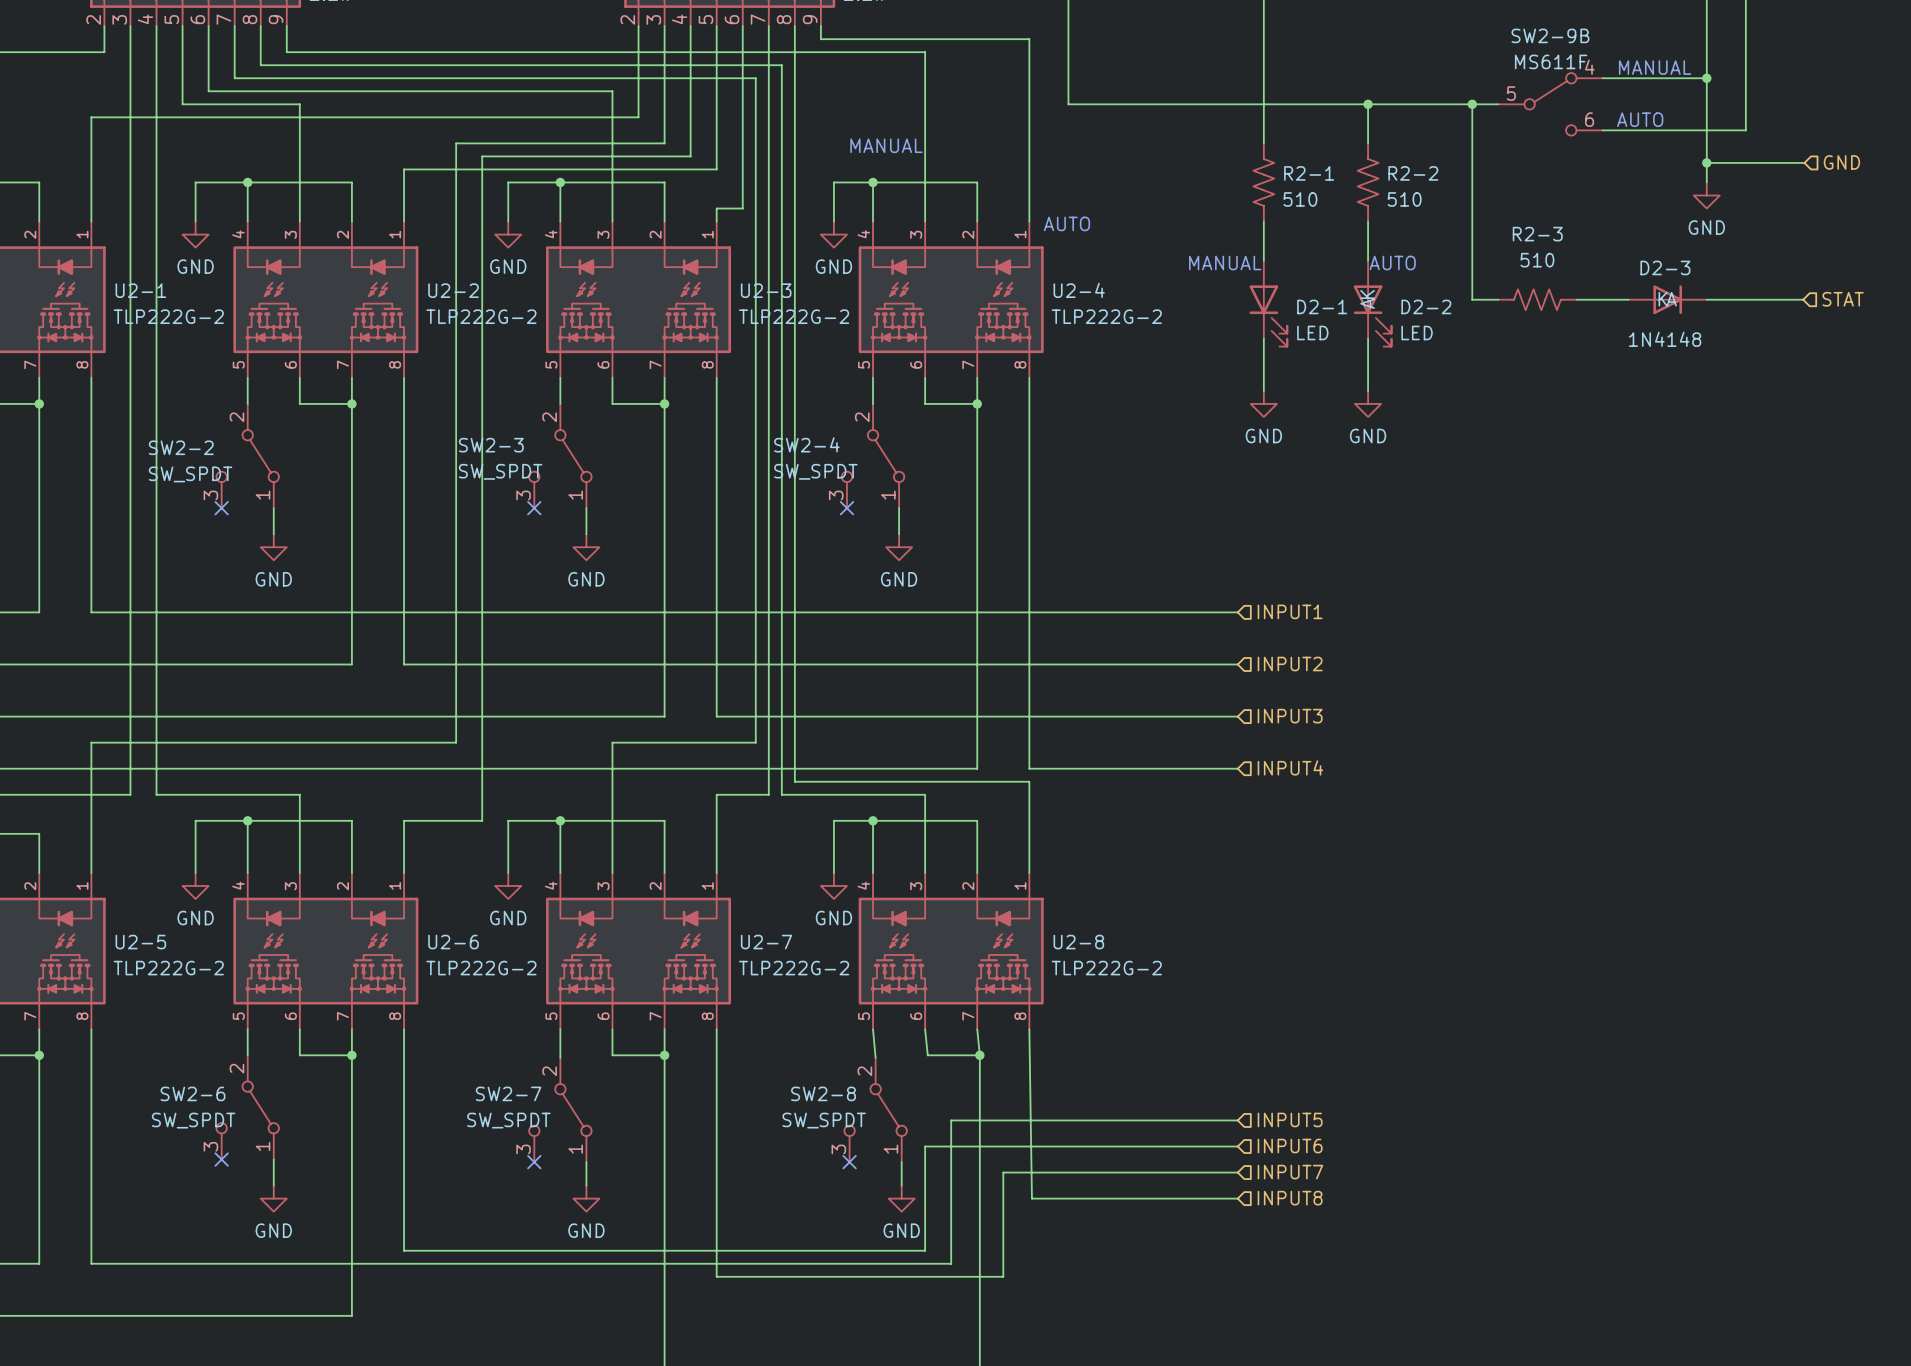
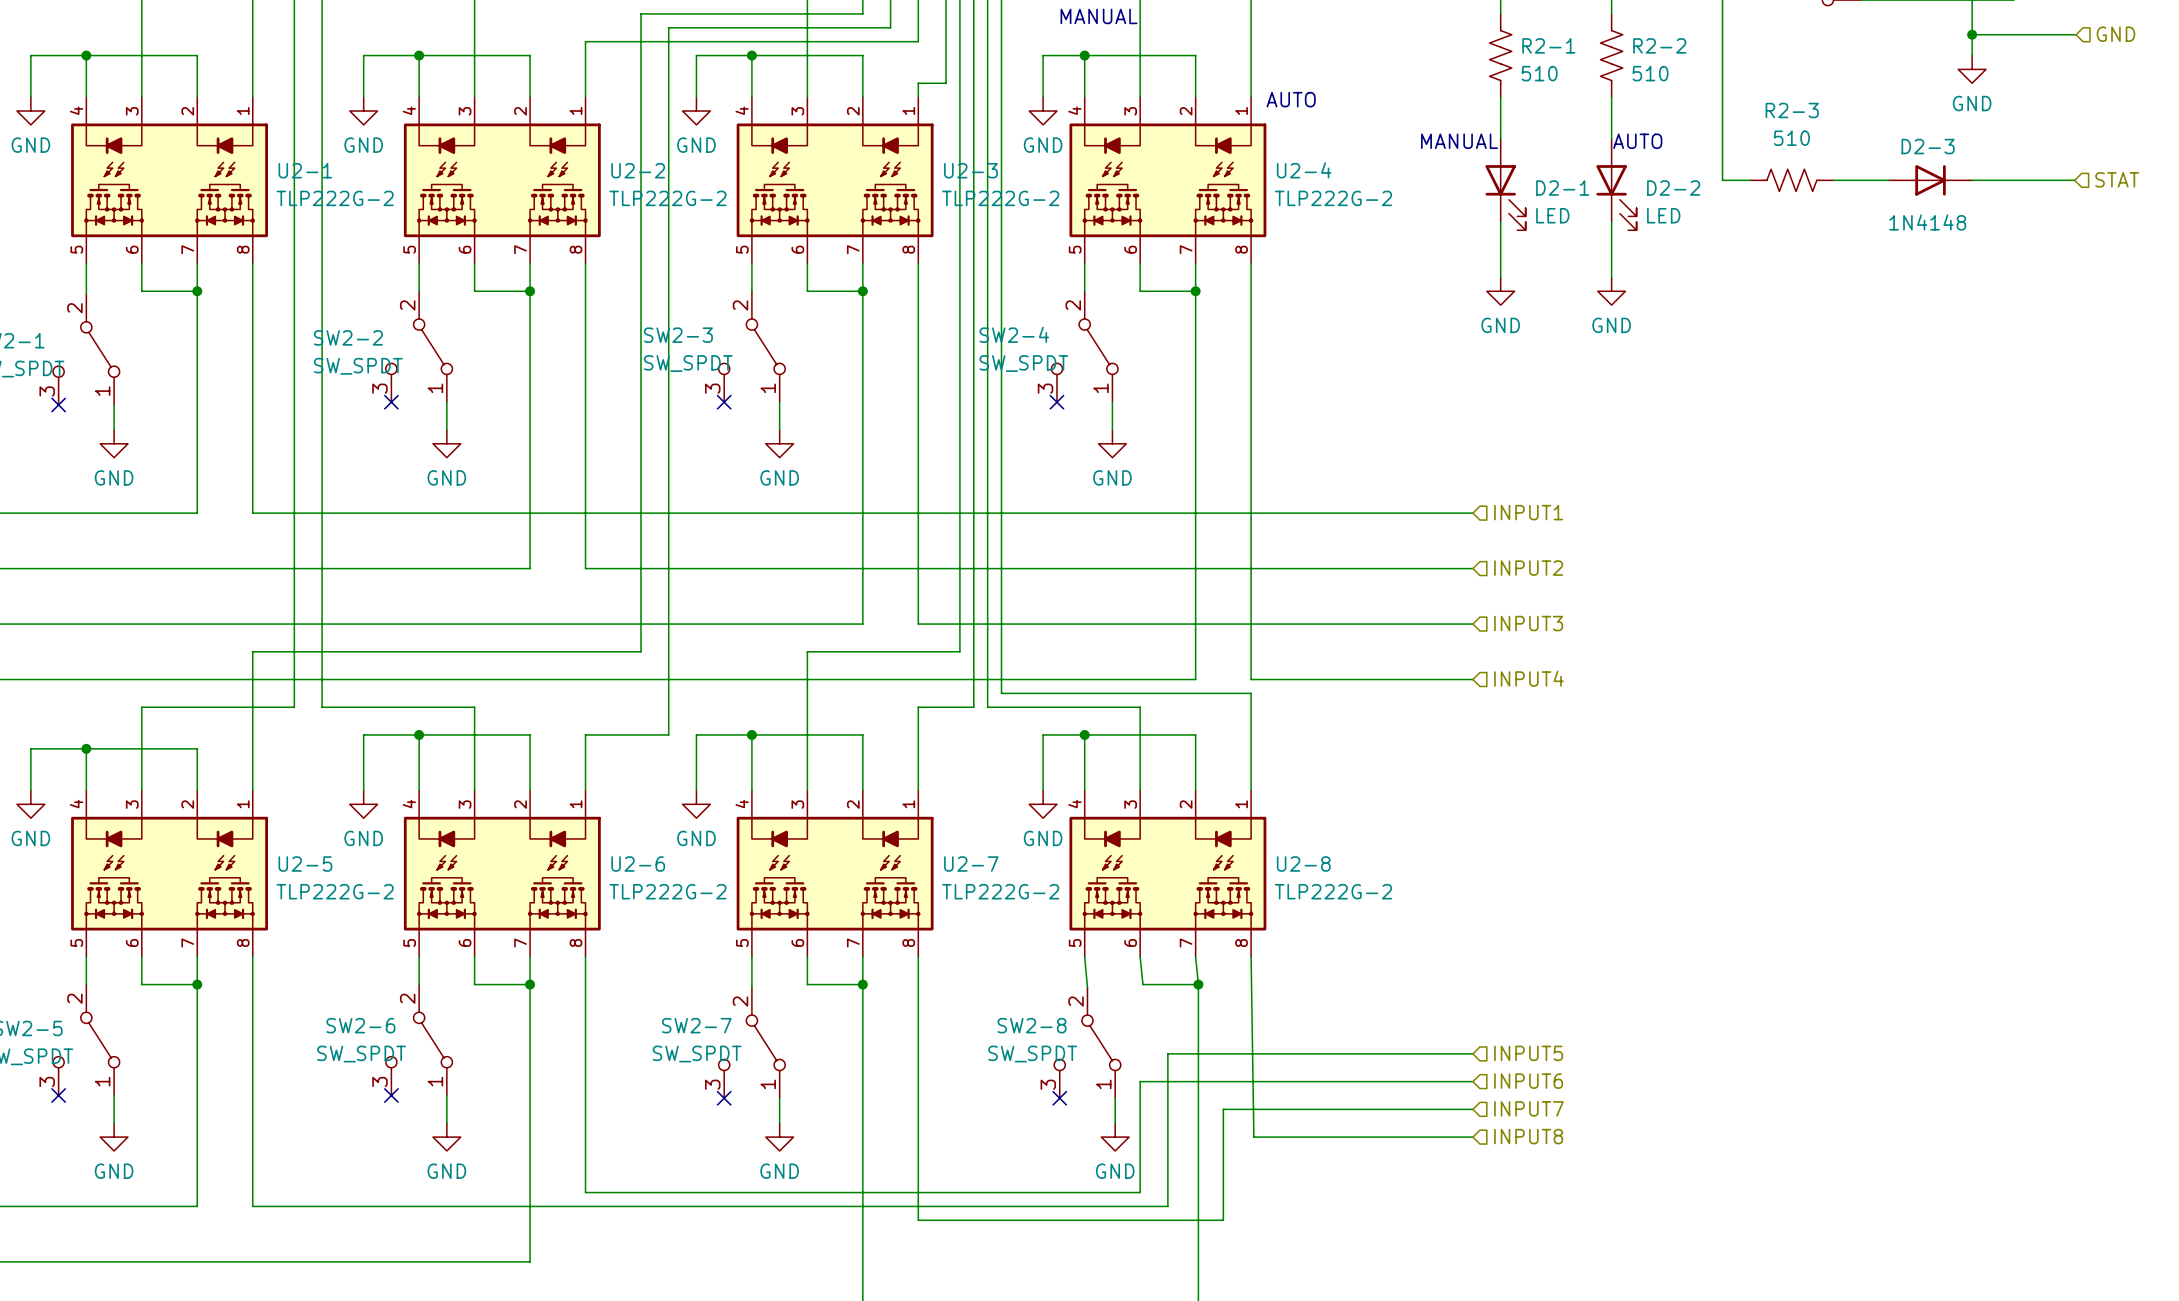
D2-2 pin name: K (1367, 294) -> none
D2-3 pin name: K (1663, 299) -> none
D2-3 pin name: A (1671, 299) -> none
D2-2 pin name: A (1367, 303) -> none

